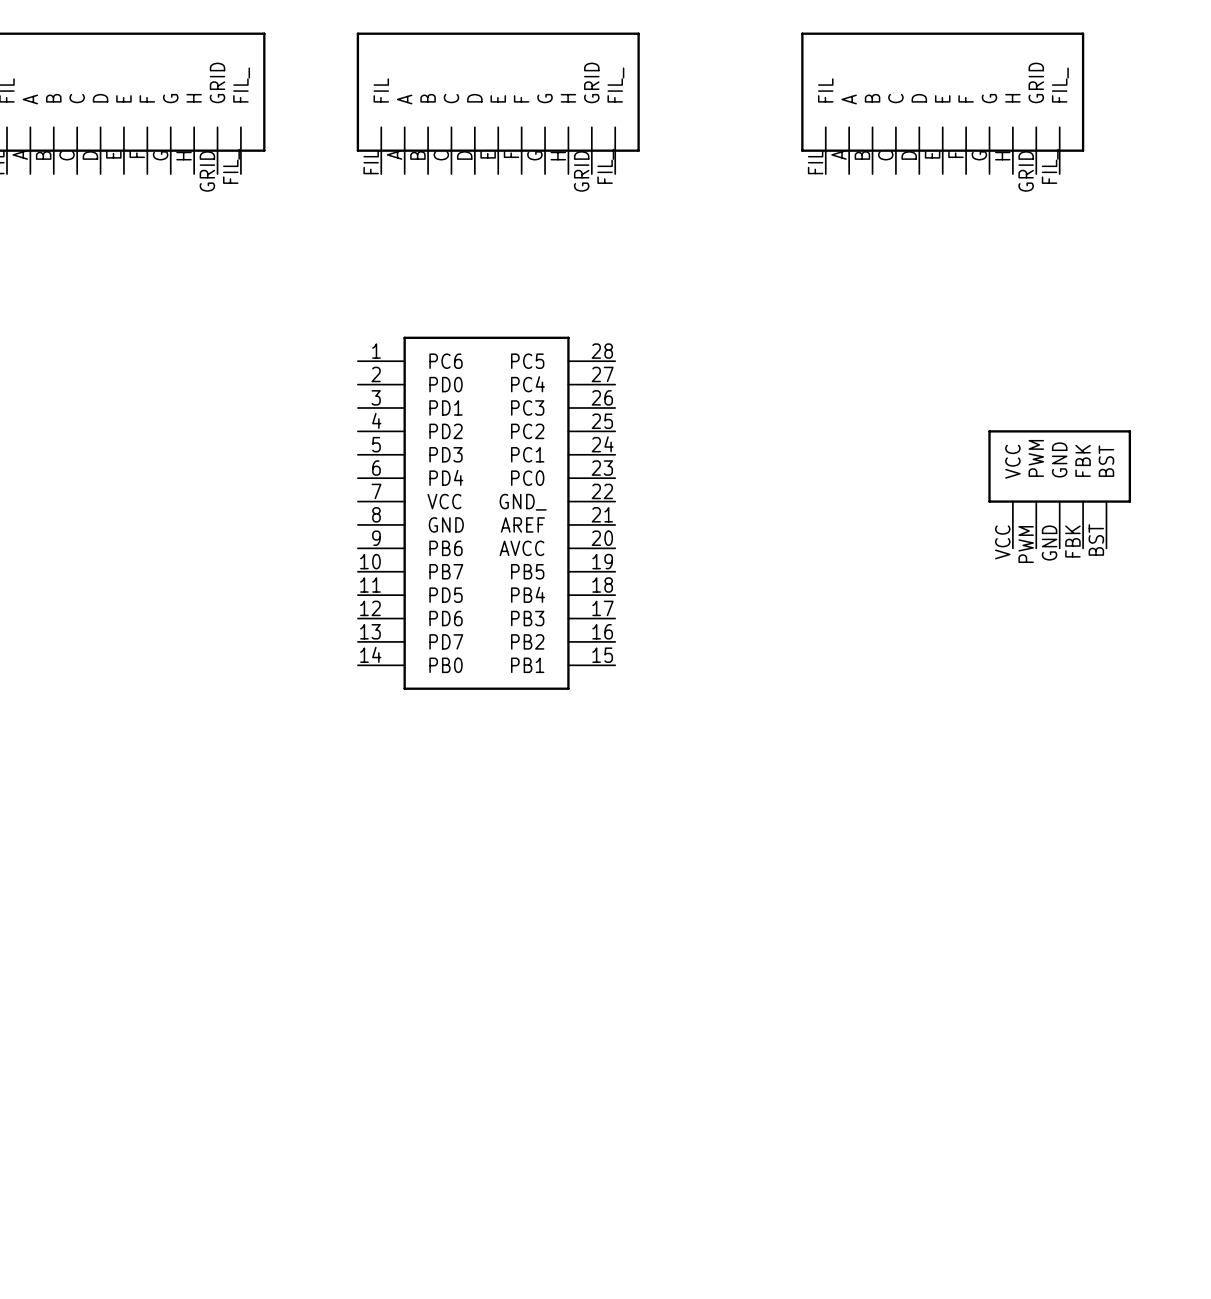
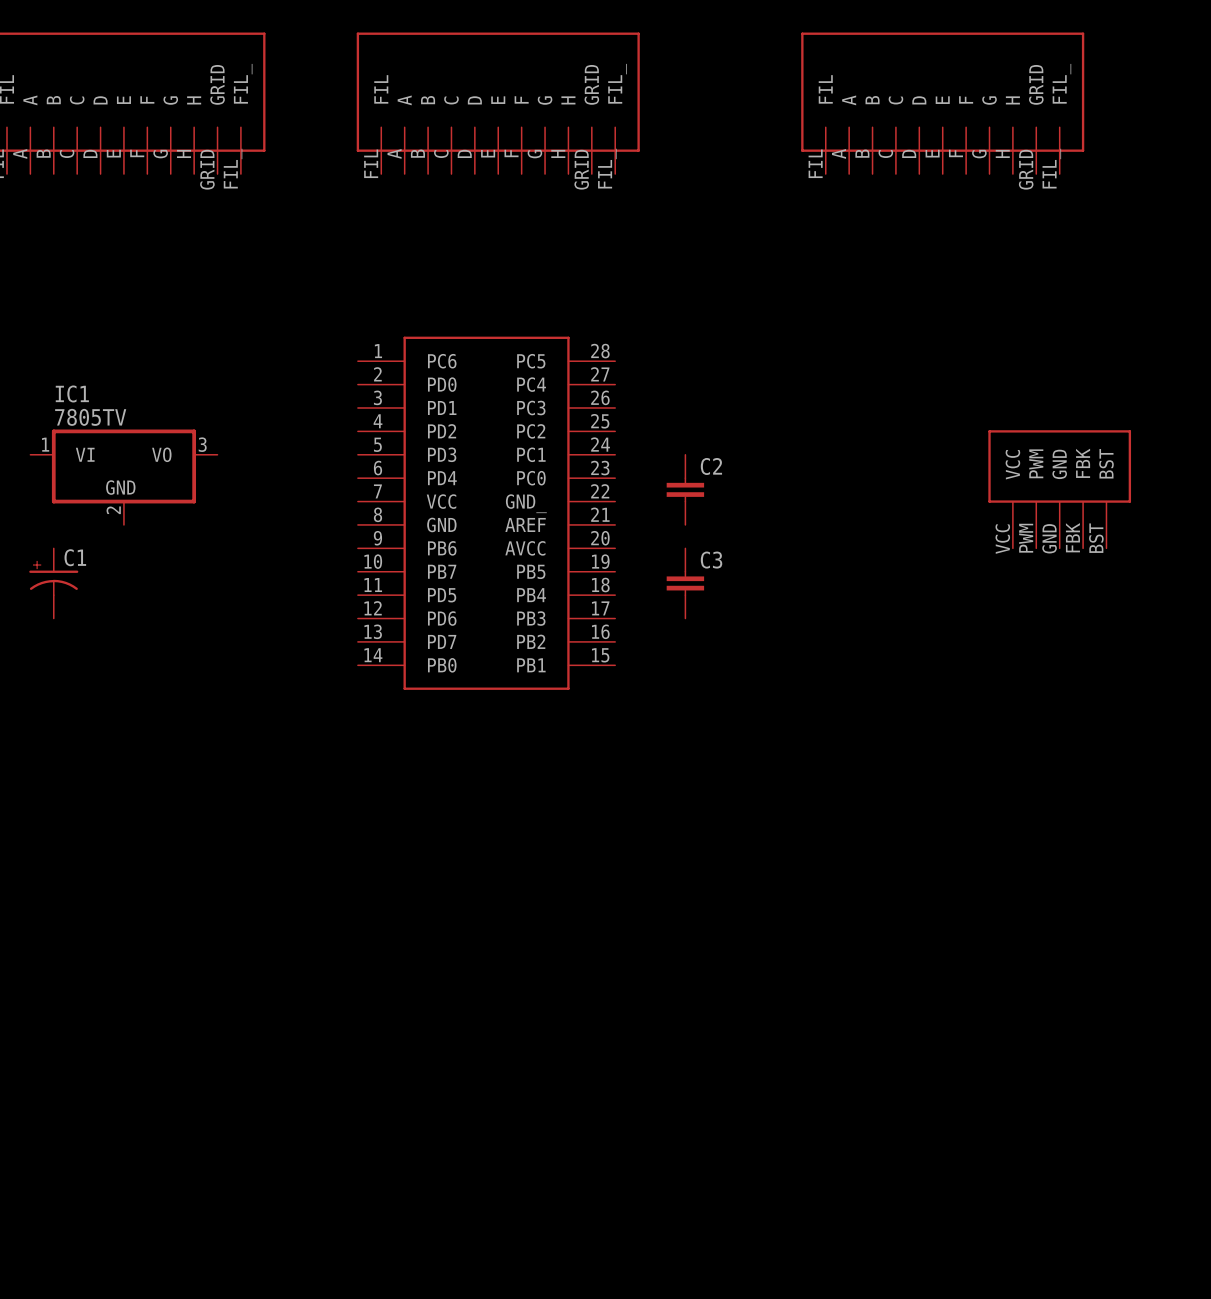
IC1: none -> 7805TV (123, 477)
C2: none -> (685, 489)
C1: none -> (53, 583)
C3: none -> (685, 583)

